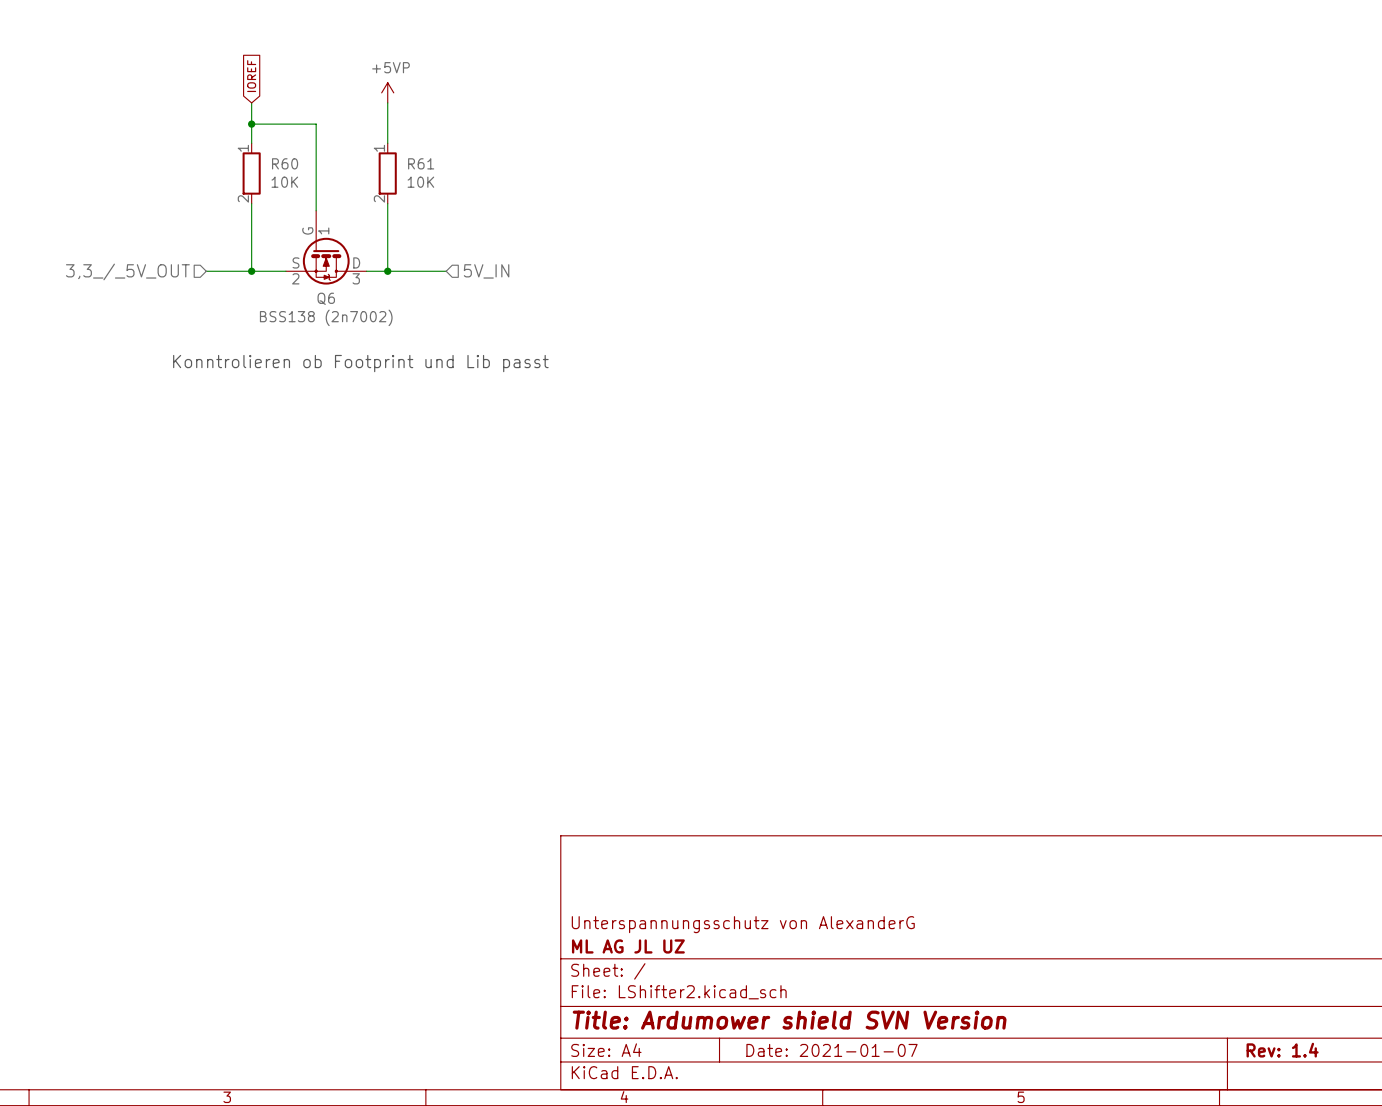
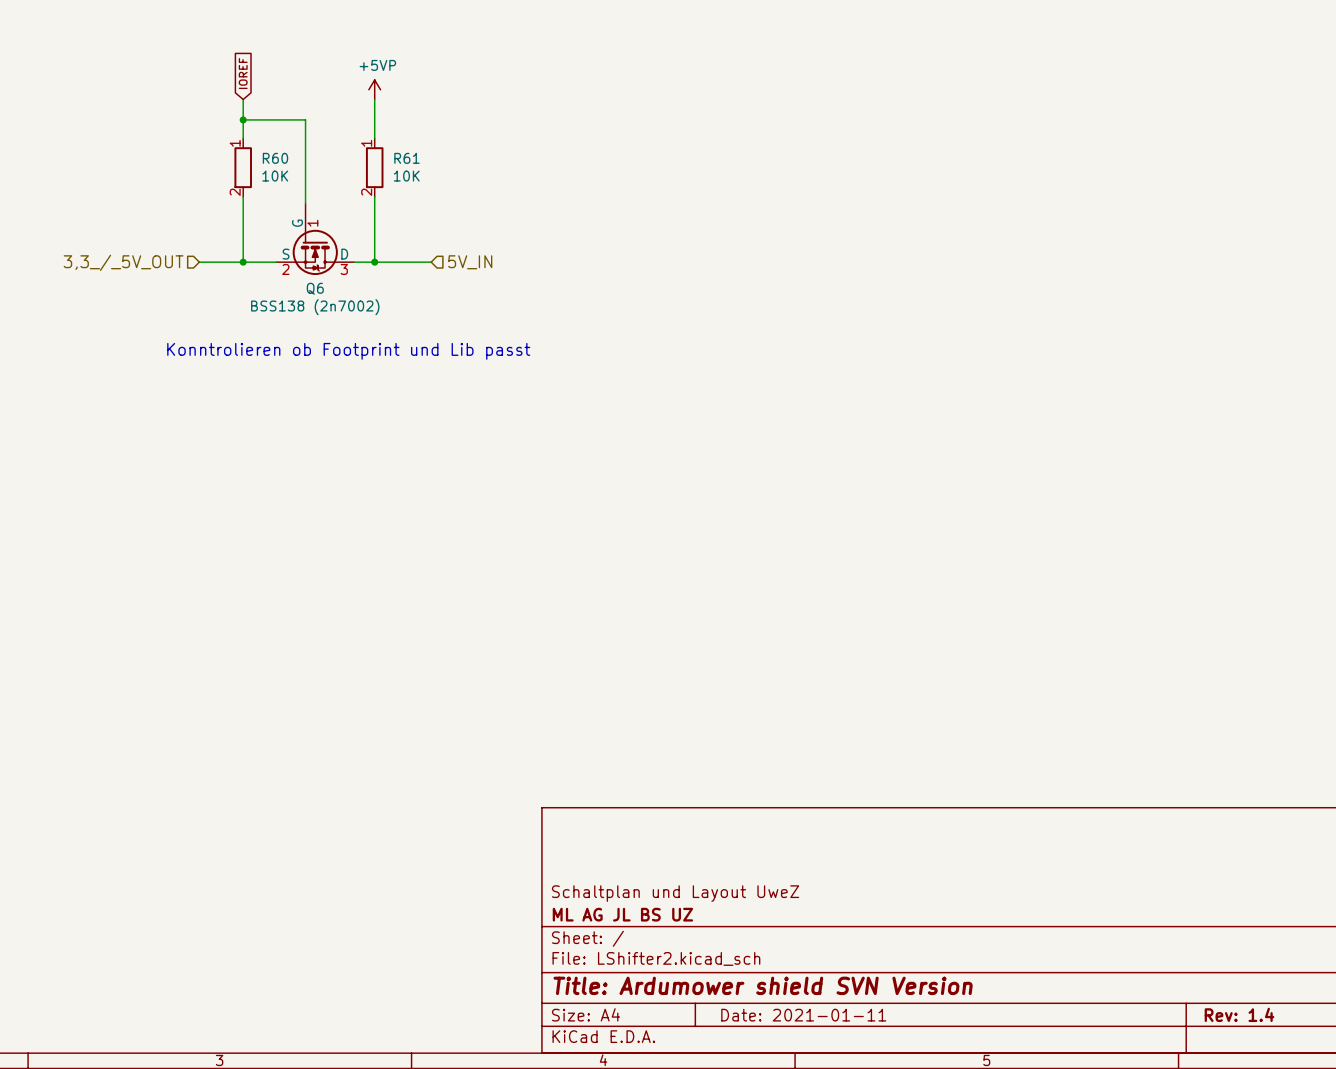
title block: Unterspannungsschutz von AlexanderG (743, 924) -> Schaltplan und Layout UweZ (675, 893)
title block: ML AG JL UZ (628, 946) -> ML AG JL BS UZ (622, 914)
title block: Date: 2021-01-07 (831, 1050) -> Date: 2021-01-11 (803, 1015)

